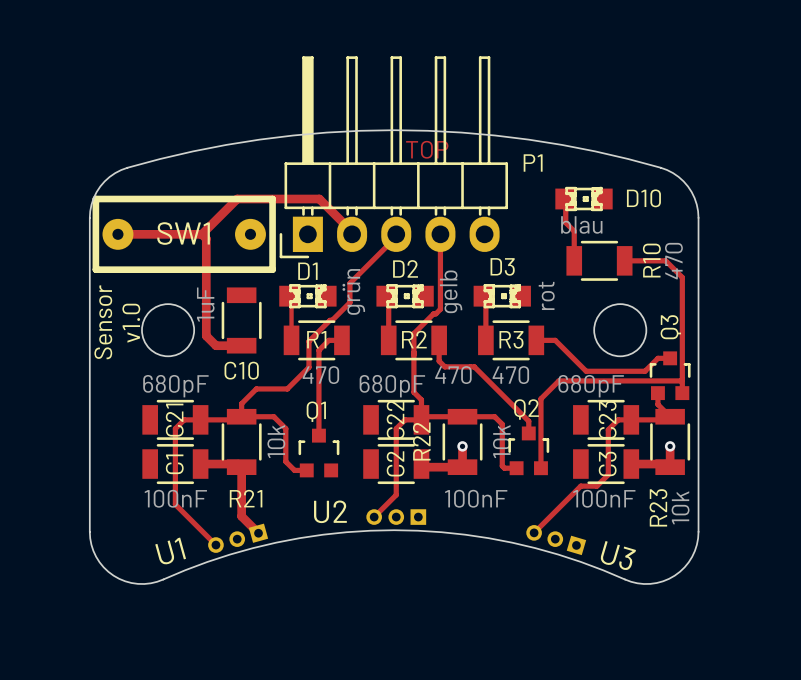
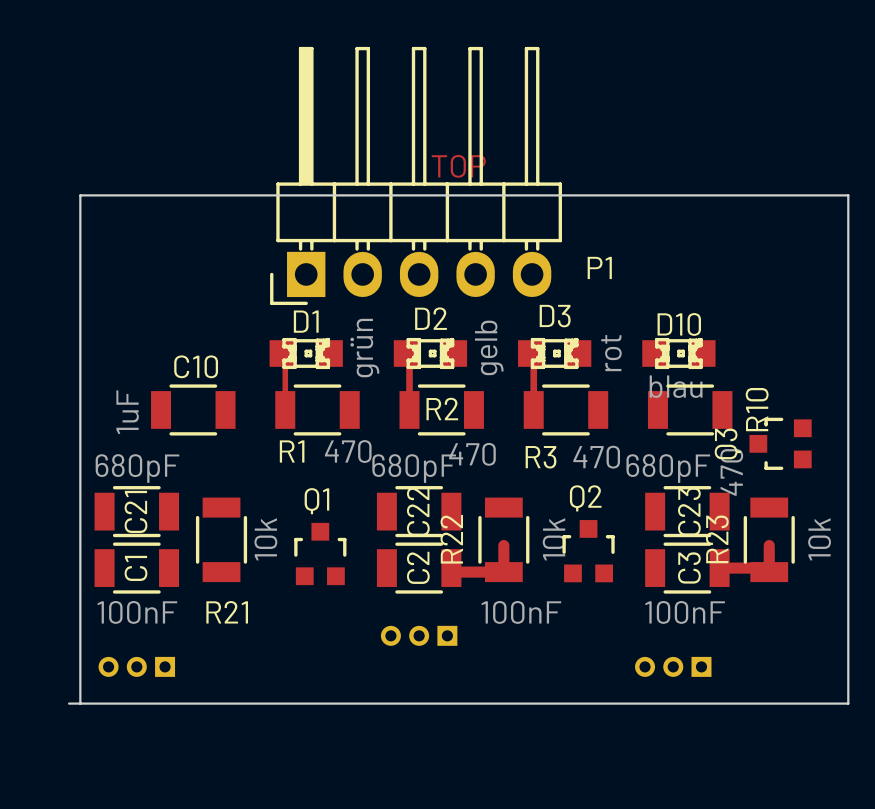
P1 name position: P1 (533, 163) -> P1 (599, 267)
board edge: (127, 167) (109, 176) (100, 186) (93, 198) (89, 217) (90, 538) (96, 556) (103, 567) (113, 575) (131, 583) (150, 583) (207, 561) (252, 548) (299, 538) (370, 530) (441, 532) (512, 542) (558, 554) (631, 581) (643, 584) (656, 583) (669, 578) (679, 571) (688, 562) (696, 544) (698, 531) (698, 217) (696, 204) (691, 192) (678, 176) (660, 167) (562, 144) (461, 132) (394, 130) (326, 132) (259, 139) (193, 151) (127, 167) -> none
D10 name position: D10 (643, 198) -> D10 (679, 324)
track: (565, 199) (565, 222) (574, 231) (574, 260) -> none
D10 position: (584, 199) -> (678, 353)
track: (117, 234) (201, 234) -> none
SW1: (184, 234) -> none
track: (201, 234) (206, 238) (206, 335) (216, 345) (241, 345) -> none
track: (201, 234) (237, 199) (319, 199) (352, 231) (352, 234) -> none
track: (396, 234) (396, 236) (349, 283) (349, 302) (308, 341) (308, 367) (287, 388) (256, 388) (241, 403) (241, 416) -> none
track: (440, 234) (440, 309) (413, 333) (413, 392) (421, 399) (421, 419) -> none
R10 position: (599, 260) -> (690, 409)
track: (624, 260) (665, 260) (682, 277) (682, 393) -> none
R10 value position: 470 (673, 261) -> 470 (731, 472)
round board edge: [141, 303, 196, 358] -> none
round board edge: [593, 303, 648, 358] -> none
C10 rotation: 0° (241, 320) -> 90° clockwise (193, 409)
text: Sensor (103, 322) -> none
text: v1.0 (131, 323) -> none
R1 name position: R1 (316, 339) -> R1 (292, 451)
R3 name position: R3 (511, 339) -> R3 (541, 457)
track: (341, 340) (328, 340) (318, 350) (318, 435) -> none
track: (439, 340) (439, 361) (444, 366) (474, 366) (528, 421) (528, 433) -> none
track: (536, 340) (555, 340) (586, 371) (645, 371) (657, 358) (670, 358) -> none
C10 name position: C10 (241, 370) -> C10 (196, 366)
R1 value position: 470 (320, 375) -> 470 (348, 451)
R2 value position: 470 (453, 375) -> 470 (472, 454)
R3 value position: 470 (510, 375) -> 470 (596, 457)
Q3 rotation: 0° (670, 375) -> 90° counterclockwise (780, 443)
track: (682, 379) (558, 380) (540, 398) (540, 468) -> none
track: (657, 393) (657, 404) (670, 416) (667, 419) (618, 419) (608, 429) (608, 474) (596, 486) (580, 486) (534, 532) -> none
track: (241, 416) (238, 419) (184, 419) (175, 428) (175, 504) (215, 545) -> none
track: (241, 416) (273, 416) (285, 428) (285, 461) (294, 470) (306, 470) -> none
track: (421, 419) (405, 419) (396, 428) (396, 494) (374, 517) -> none
track: (421, 419) (424, 416) (494, 416) (502, 424) (502, 466) (504, 468) (516, 468) -> none
via: (462, 446) -> none
via: (670, 446) -> none
track: (200, 464) (238, 464) (241, 467) (241, 516) (258, 533) -> none
R23 name position: R23 (658, 507) -> R23 (717, 539)
R23 value position: 10k (680, 507) -> 10k (819, 539)
U2 name: U2 (330, 511) -> none
U1: (238, 538) -> none
U3: (556, 540) -> none
part: none -> (136, 666)
part: none -> (673, 666)
board edge: none -> (69, 703) (848, 703) (848, 195) (80, 195) (80, 703)

